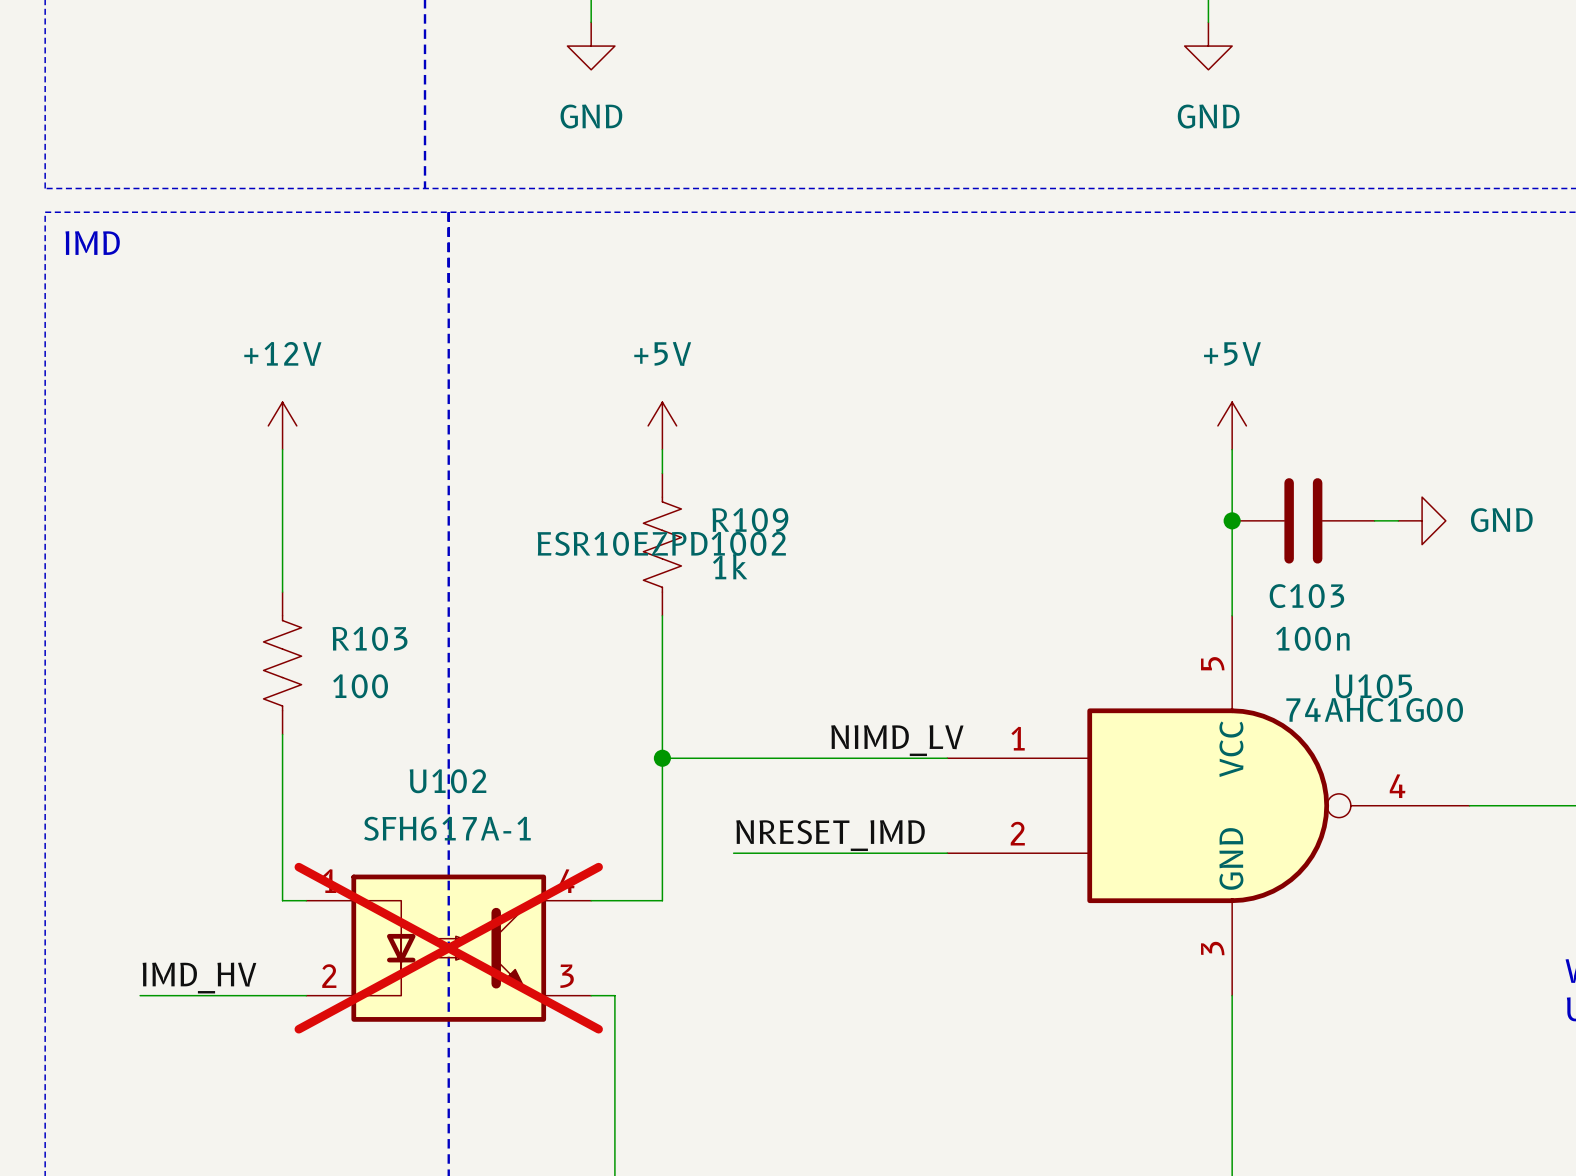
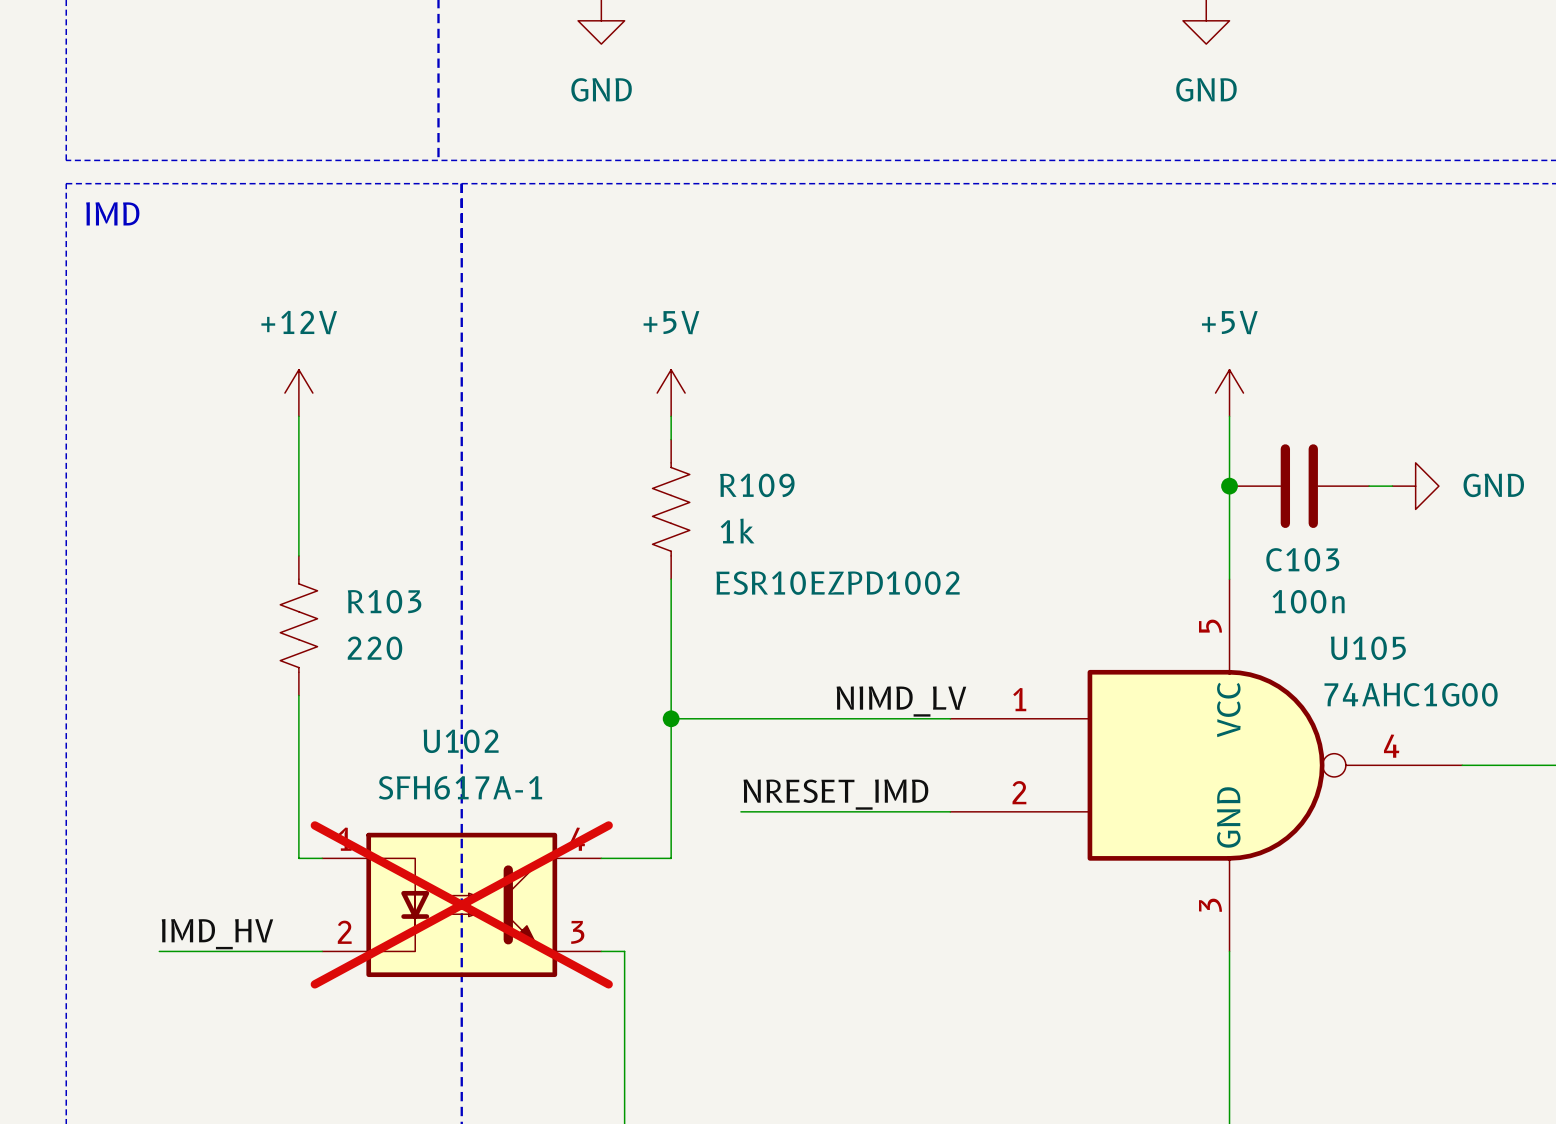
R109 text position: ESR10EZPD1002 (661, 543) -> ESR10EZPD1002 (838, 583)
R103 value: 100 (360, 686) -> 220 (374, 648)
U105 value position: 74AHC1G00 (1374, 710) -> 74AHC1G00 (1411, 694)

